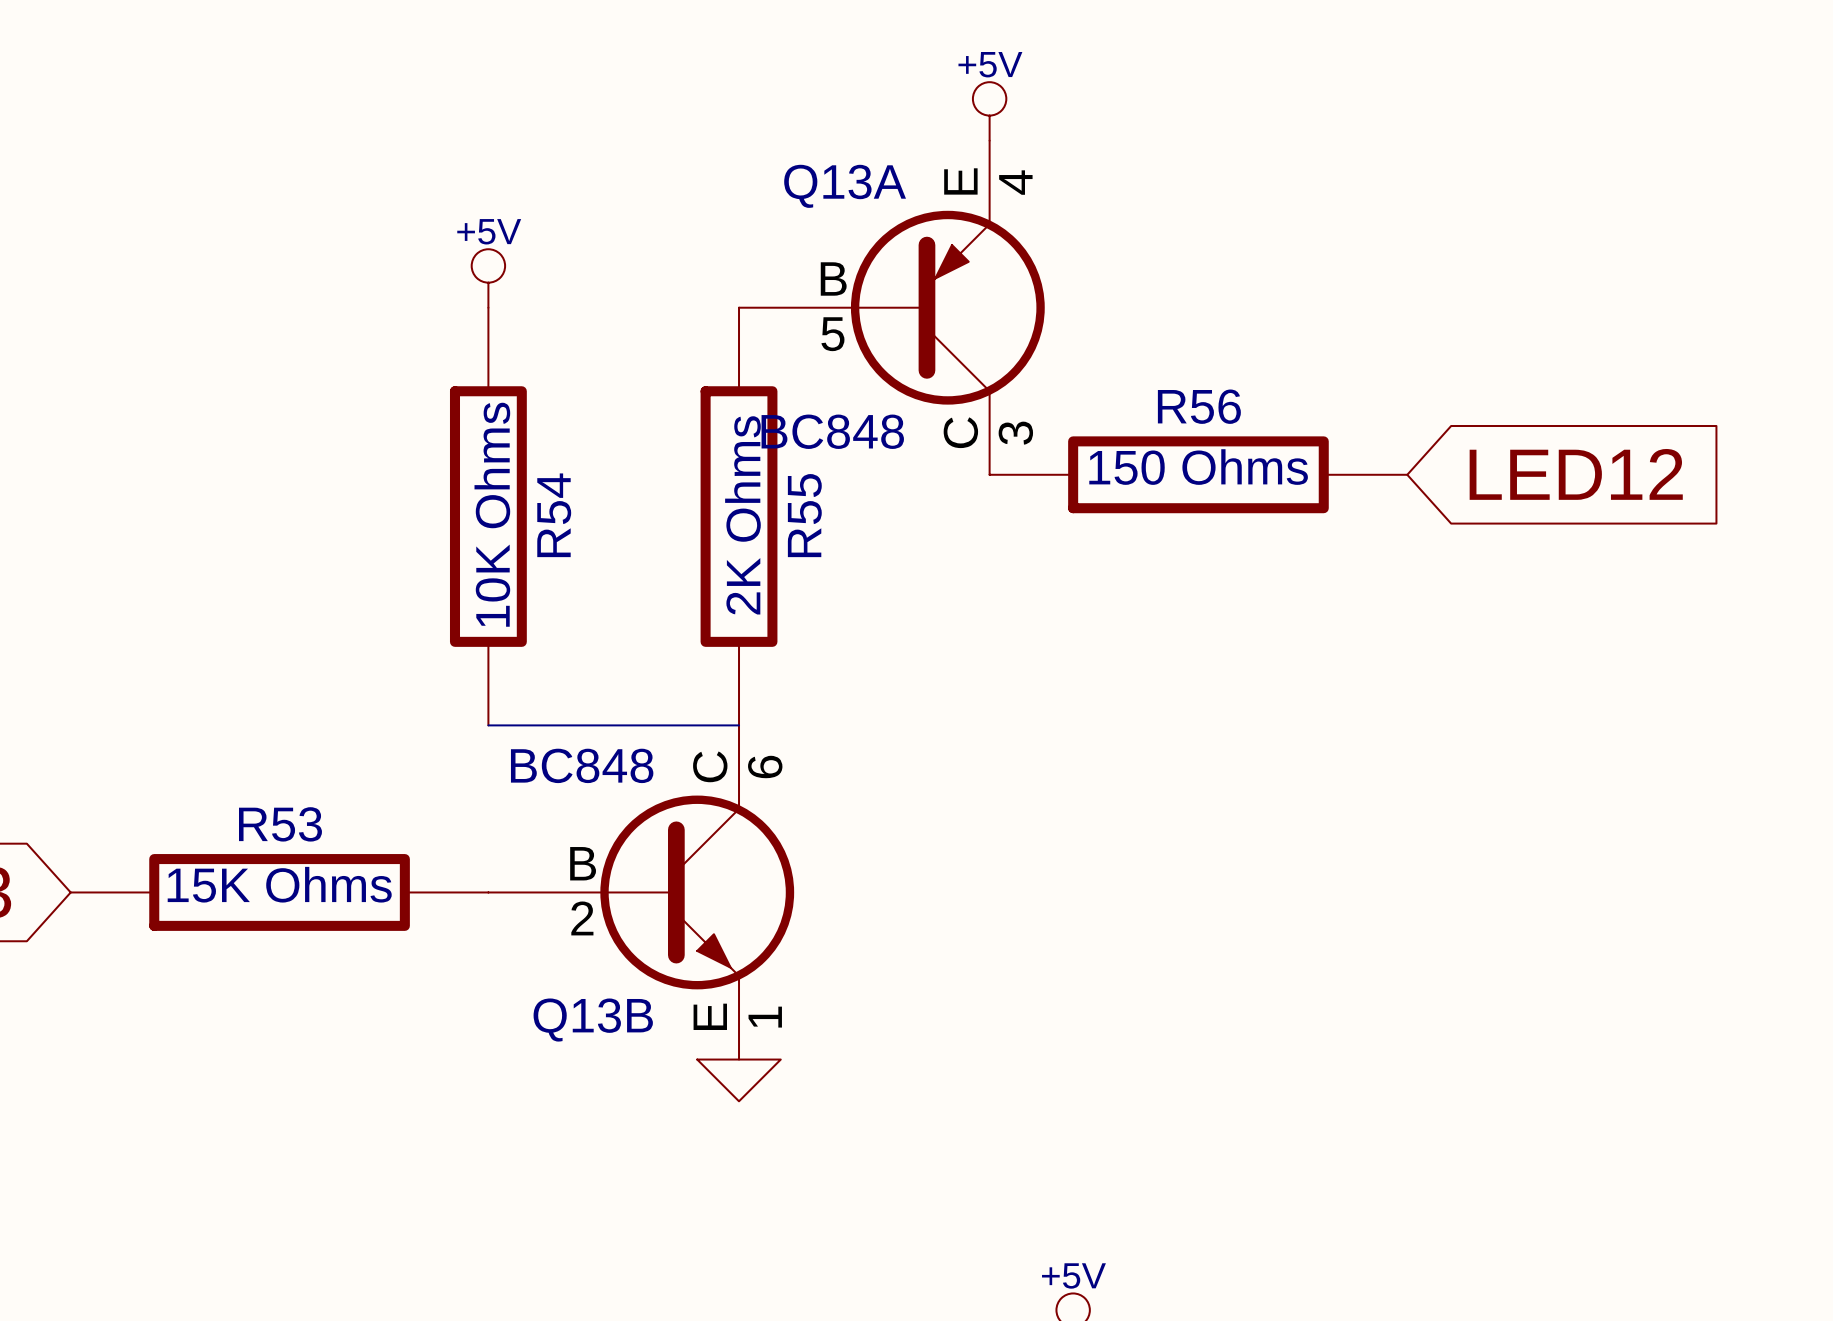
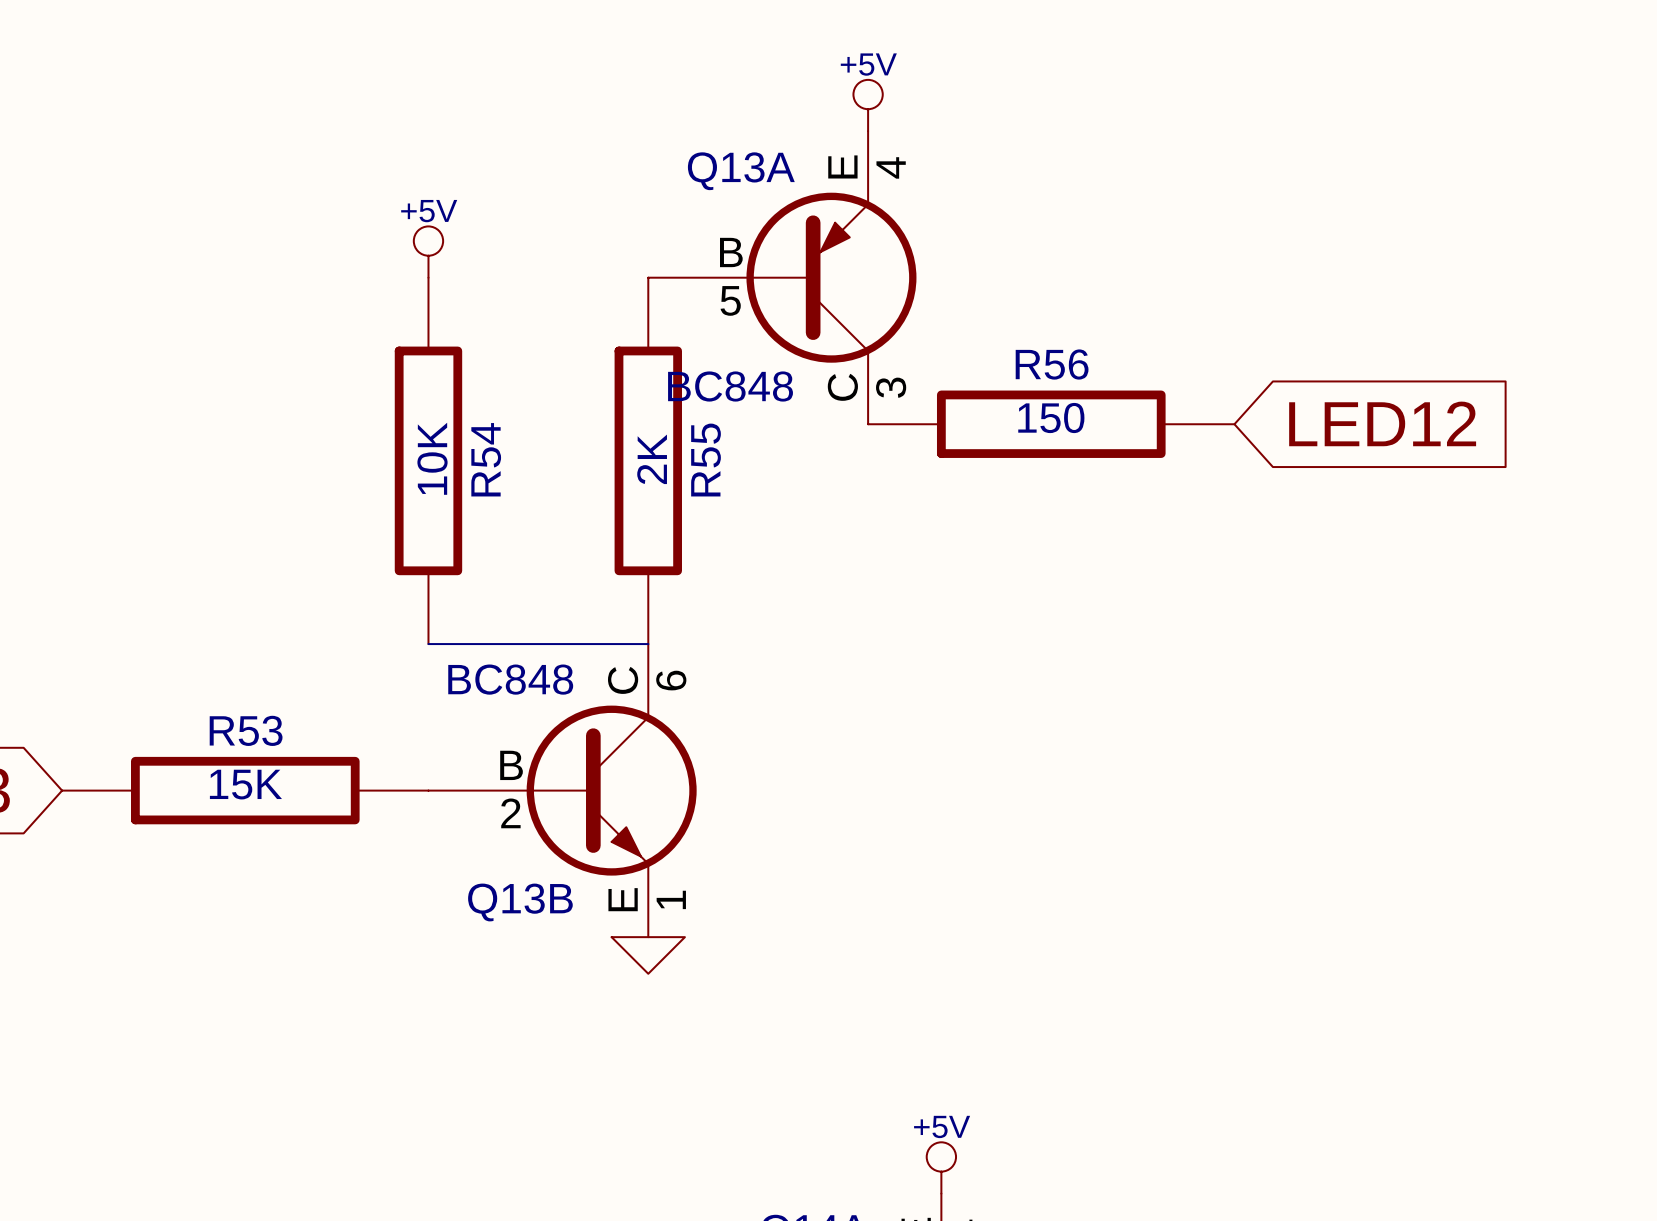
R56 value: 150 Ohms (1198, 467) -> 150 (1051, 418)
R54 value: 10K Ohms (492, 514) -> 10K (432, 458)
R55 value: 2K Ohms (742, 515) -> 2K (652, 459)
R53 value: 15K Ohms (279, 884) -> 15K (245, 784)

